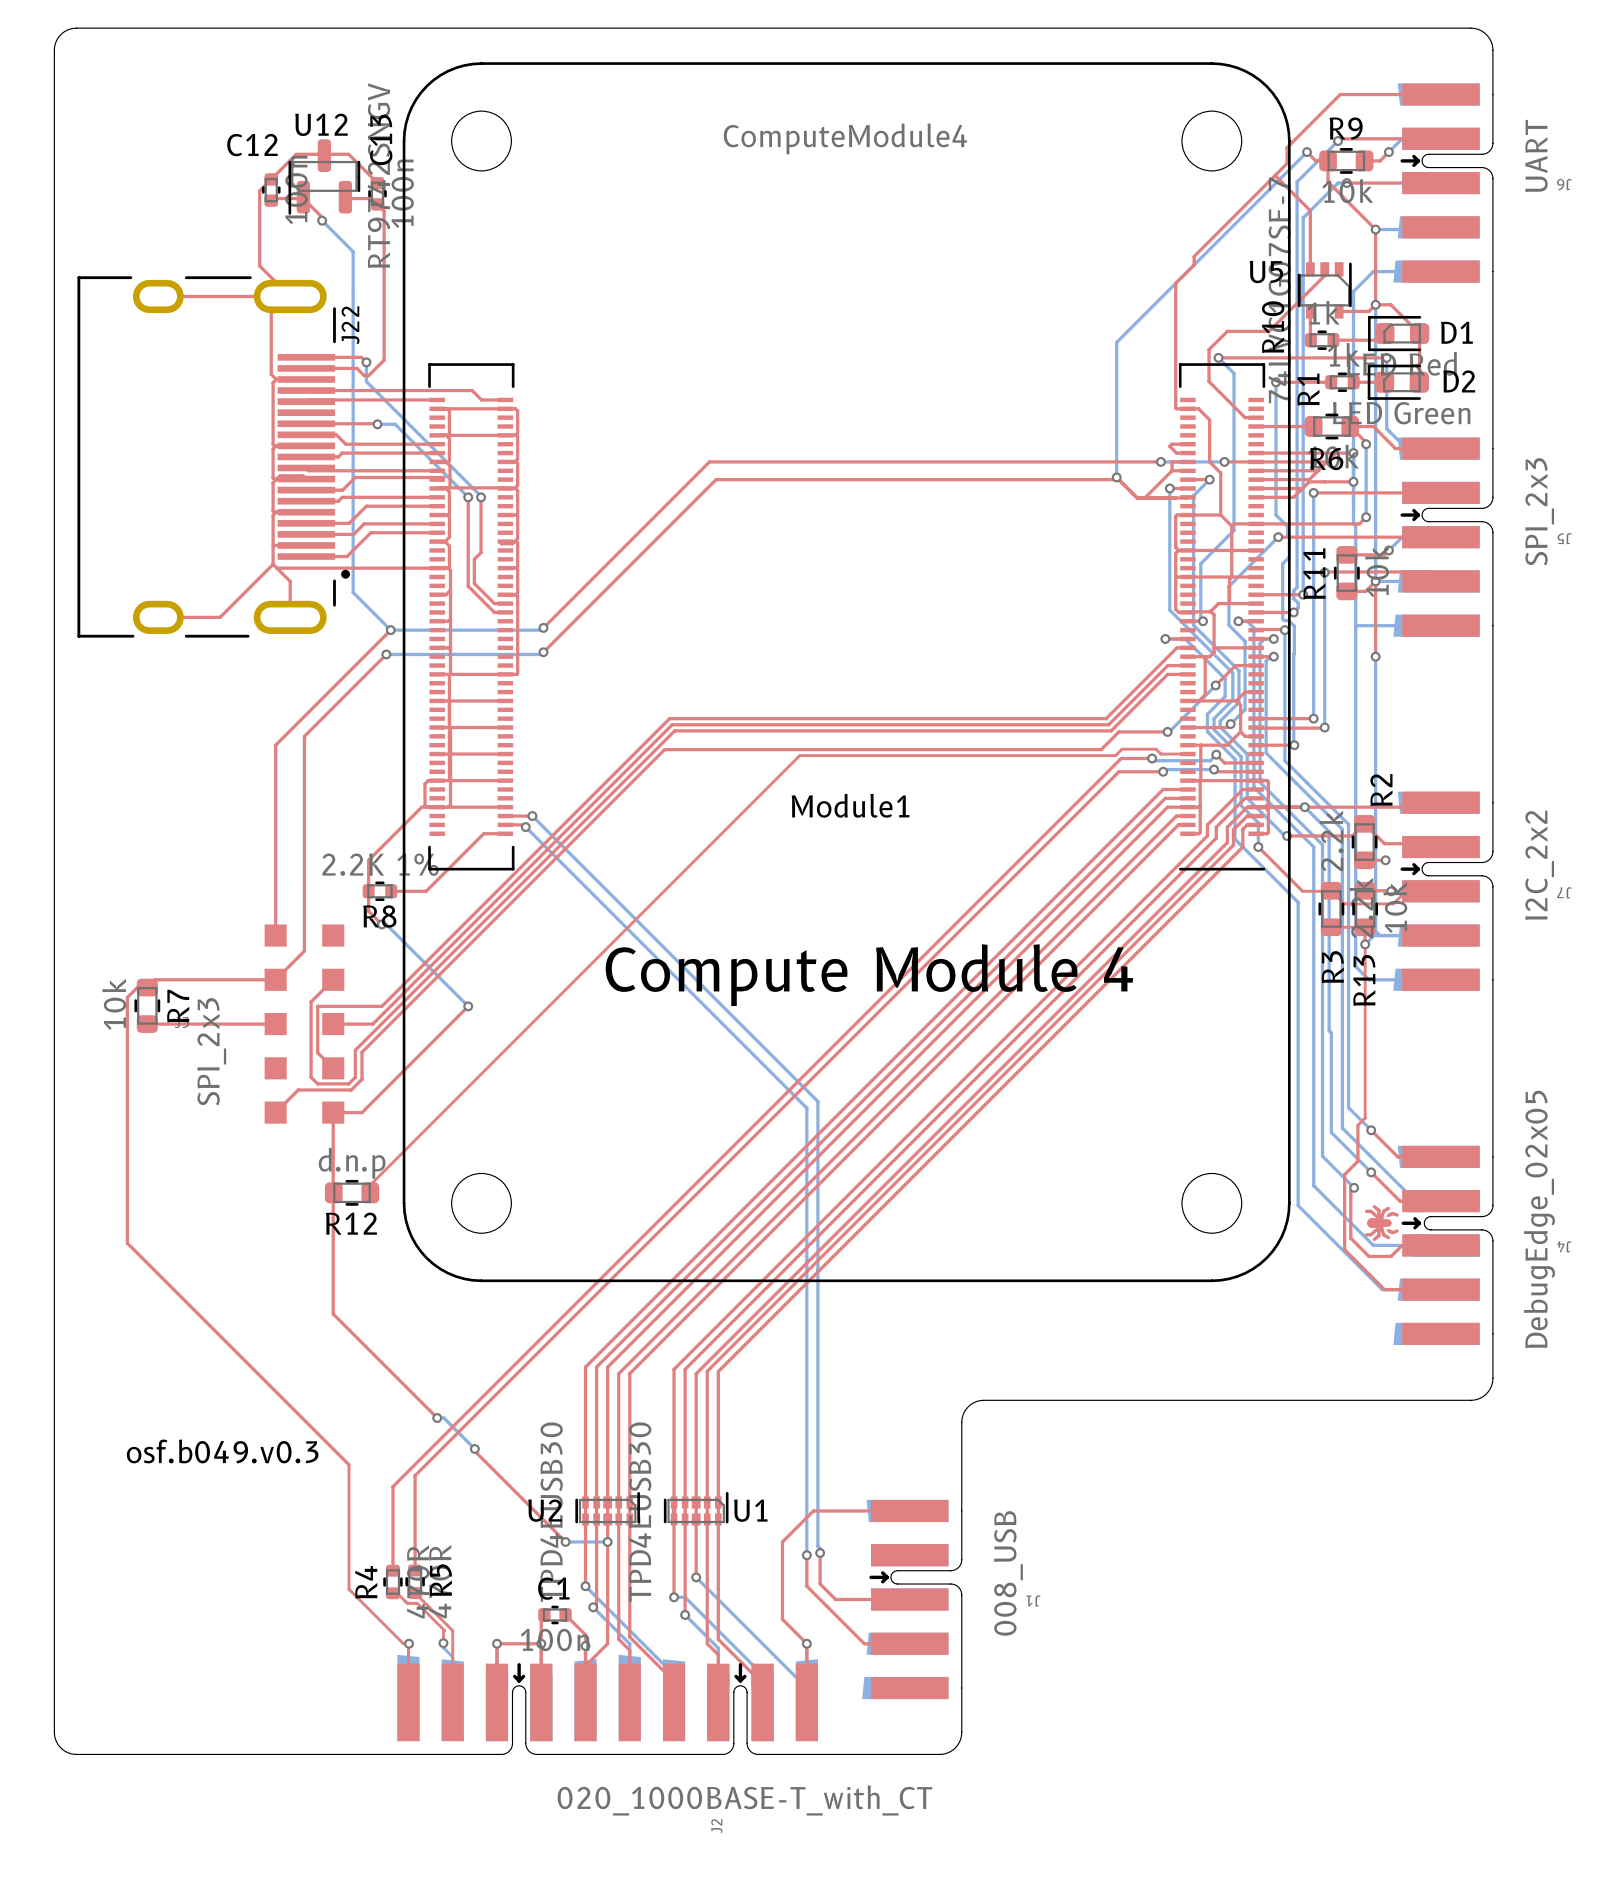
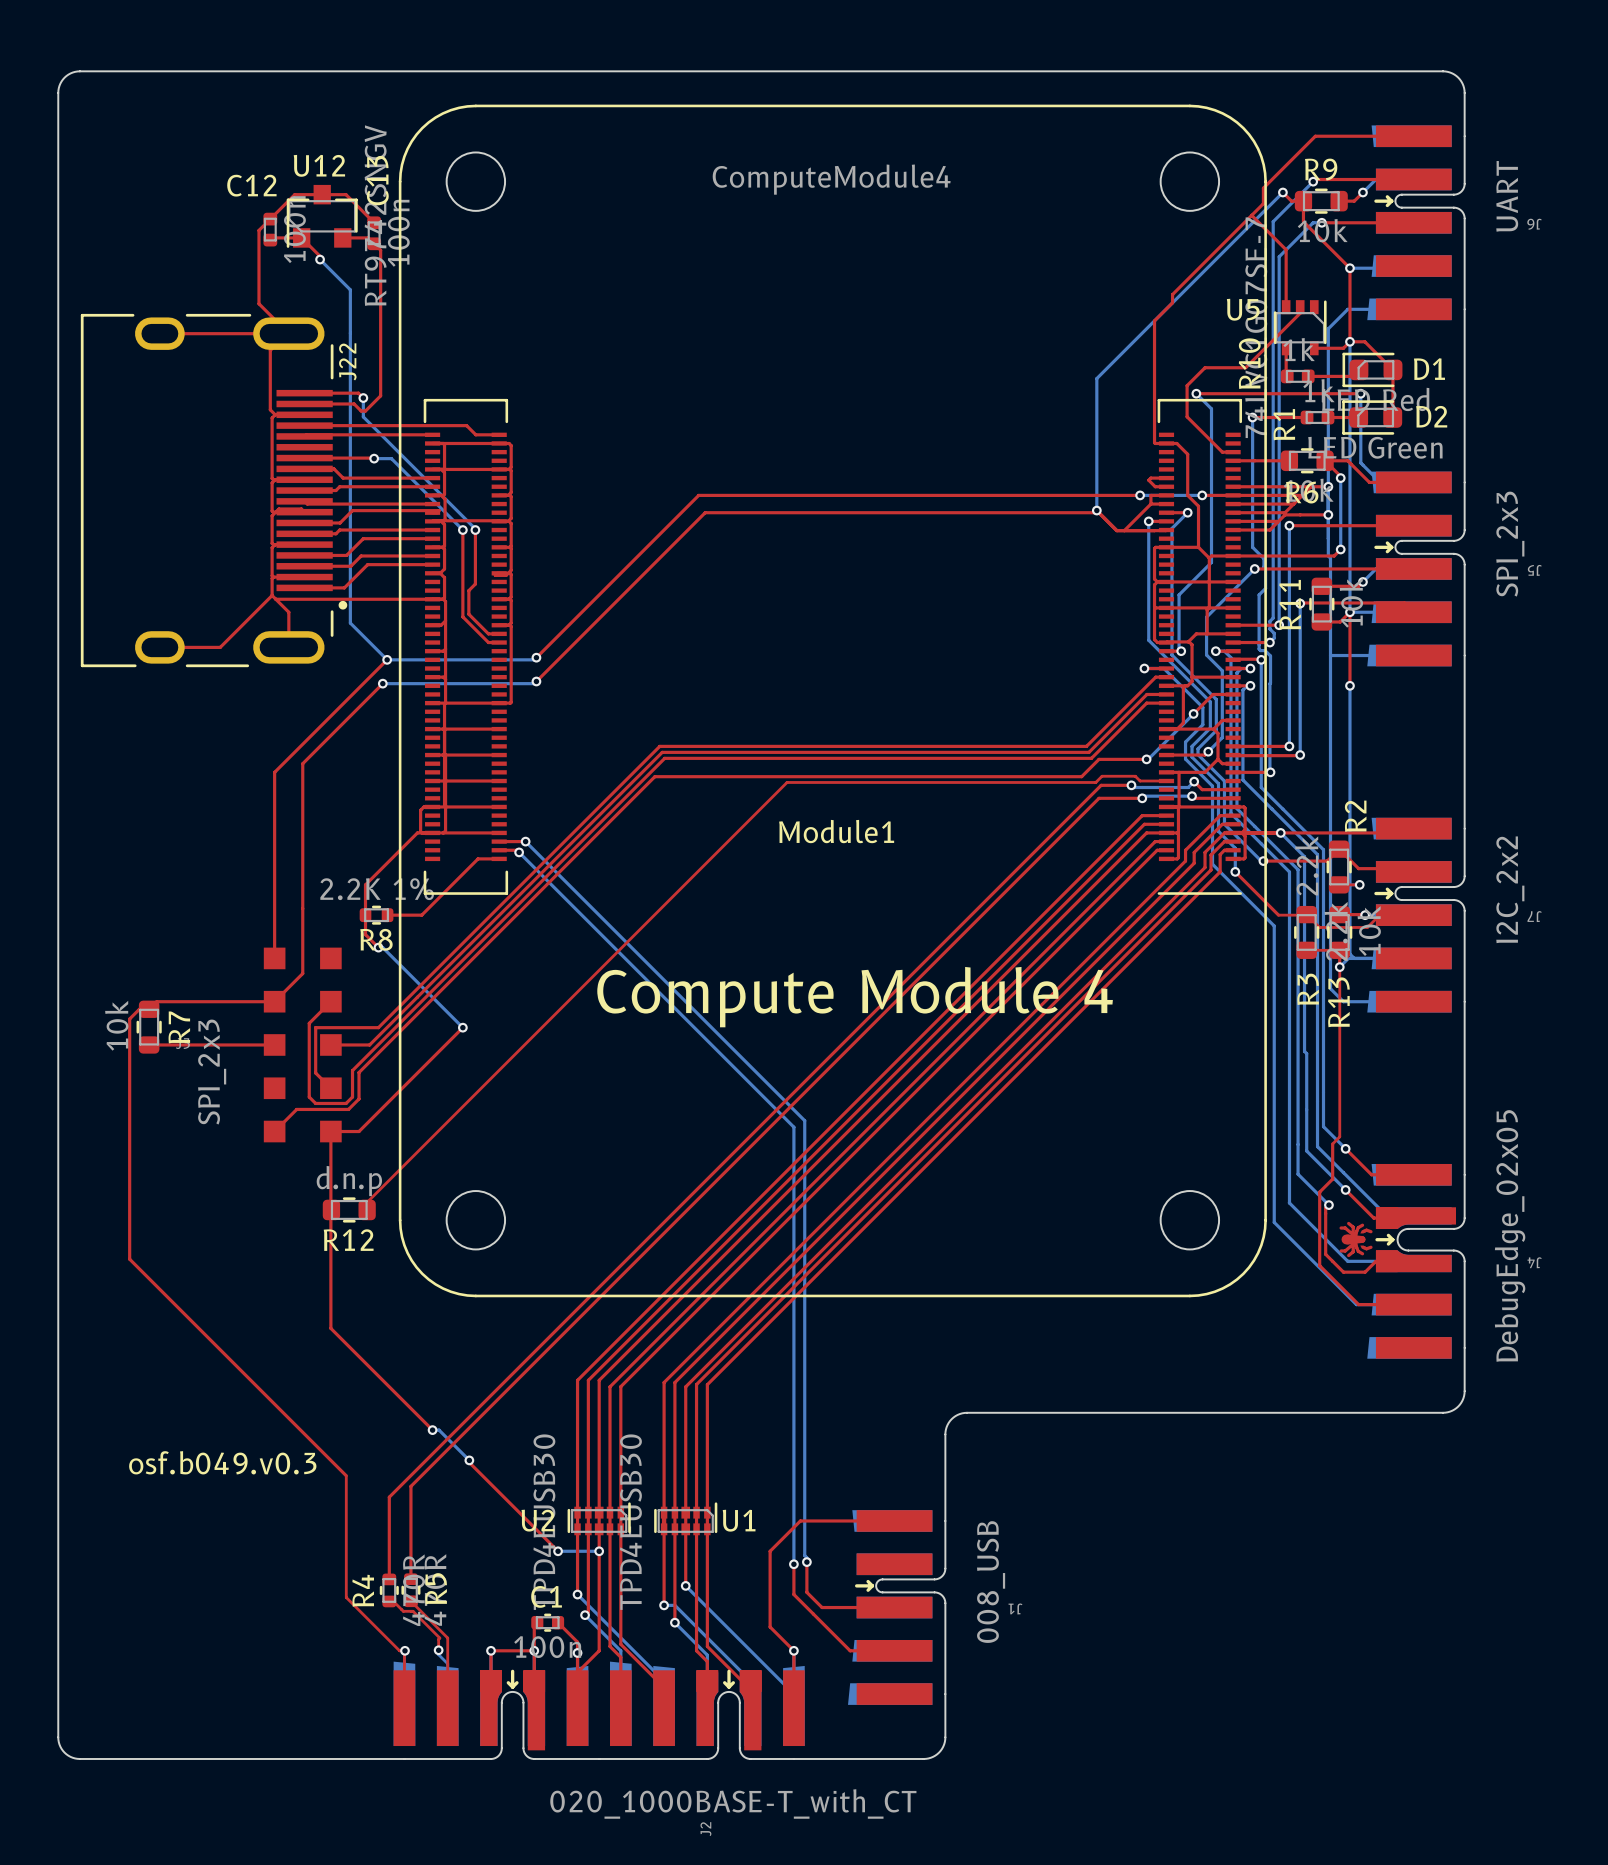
U12 footprint: [288, 139, 361, 215] -> [286, 184, 358, 248]
C12 footprint: [261, 173, 281, 207] -> [263, 212, 278, 247]
C13 footprint: [368, 176, 387, 211] -> [367, 216, 382, 251]
R10 footprint: [1304, 330, 1340, 350] -> [1280, 369, 1315, 384]
R1 footprint: [1325, 372, 1360, 392] -> [1300, 410, 1335, 425]
J4 footprint: [1364, 1145, 1494, 1345] -> [1339, 1163, 1466, 1359]
J2 footprint: [397, 1654, 818, 1755] -> [393, 1661, 805, 1760]

